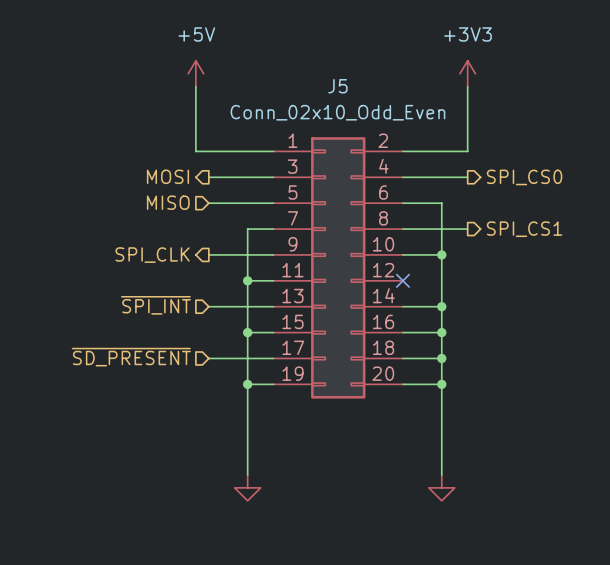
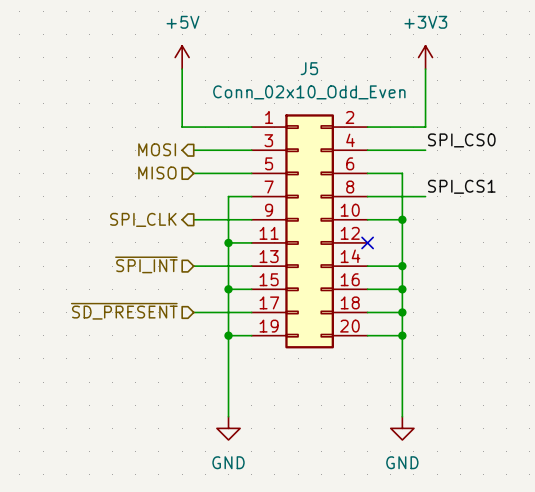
label: none -> SPI_CS0 (461, 140)
hierarchical label: SPI_CS0 (524, 177) -> none
label: none -> SPI_CS1 (461, 186)
hierarchical label: SPI_CS1 (524, 229) -> none
power symbol text: none -> GND (228, 462)
power symbol text: none -> GND (402, 462)

